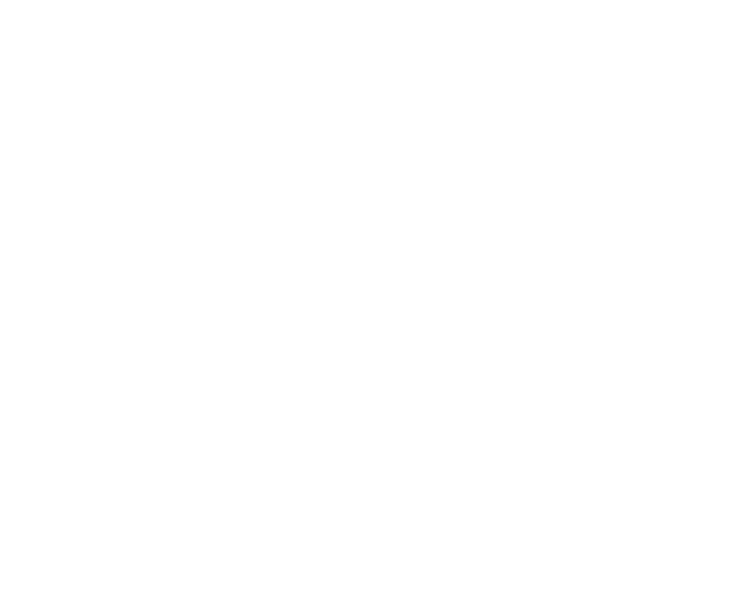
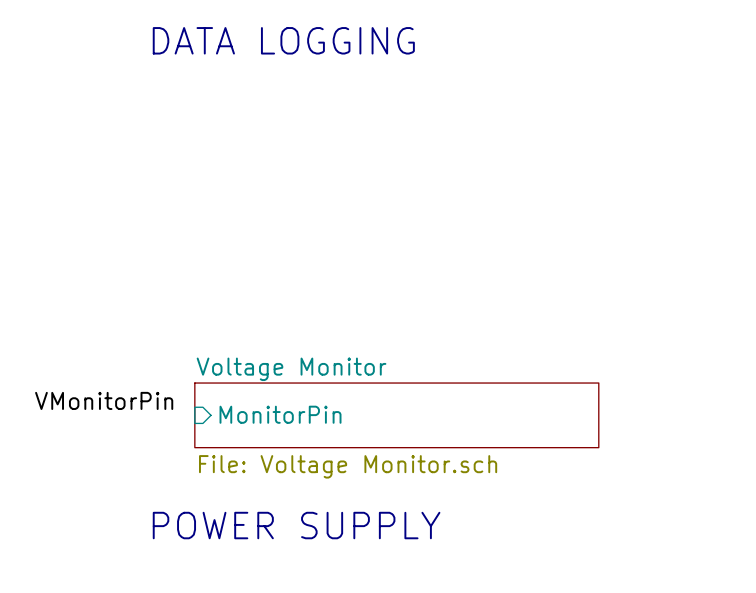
text: none -> DATA LOGGING (283, 40)
label: none -> VMonitorPin (104, 400)
sheet pin: none -> MonitorPin (280, 414)
sheet Voltage Monitor: none -> File: Voltage Monitor.sch (396, 415)
text: none -> POWER SUPPLY (296, 525)

